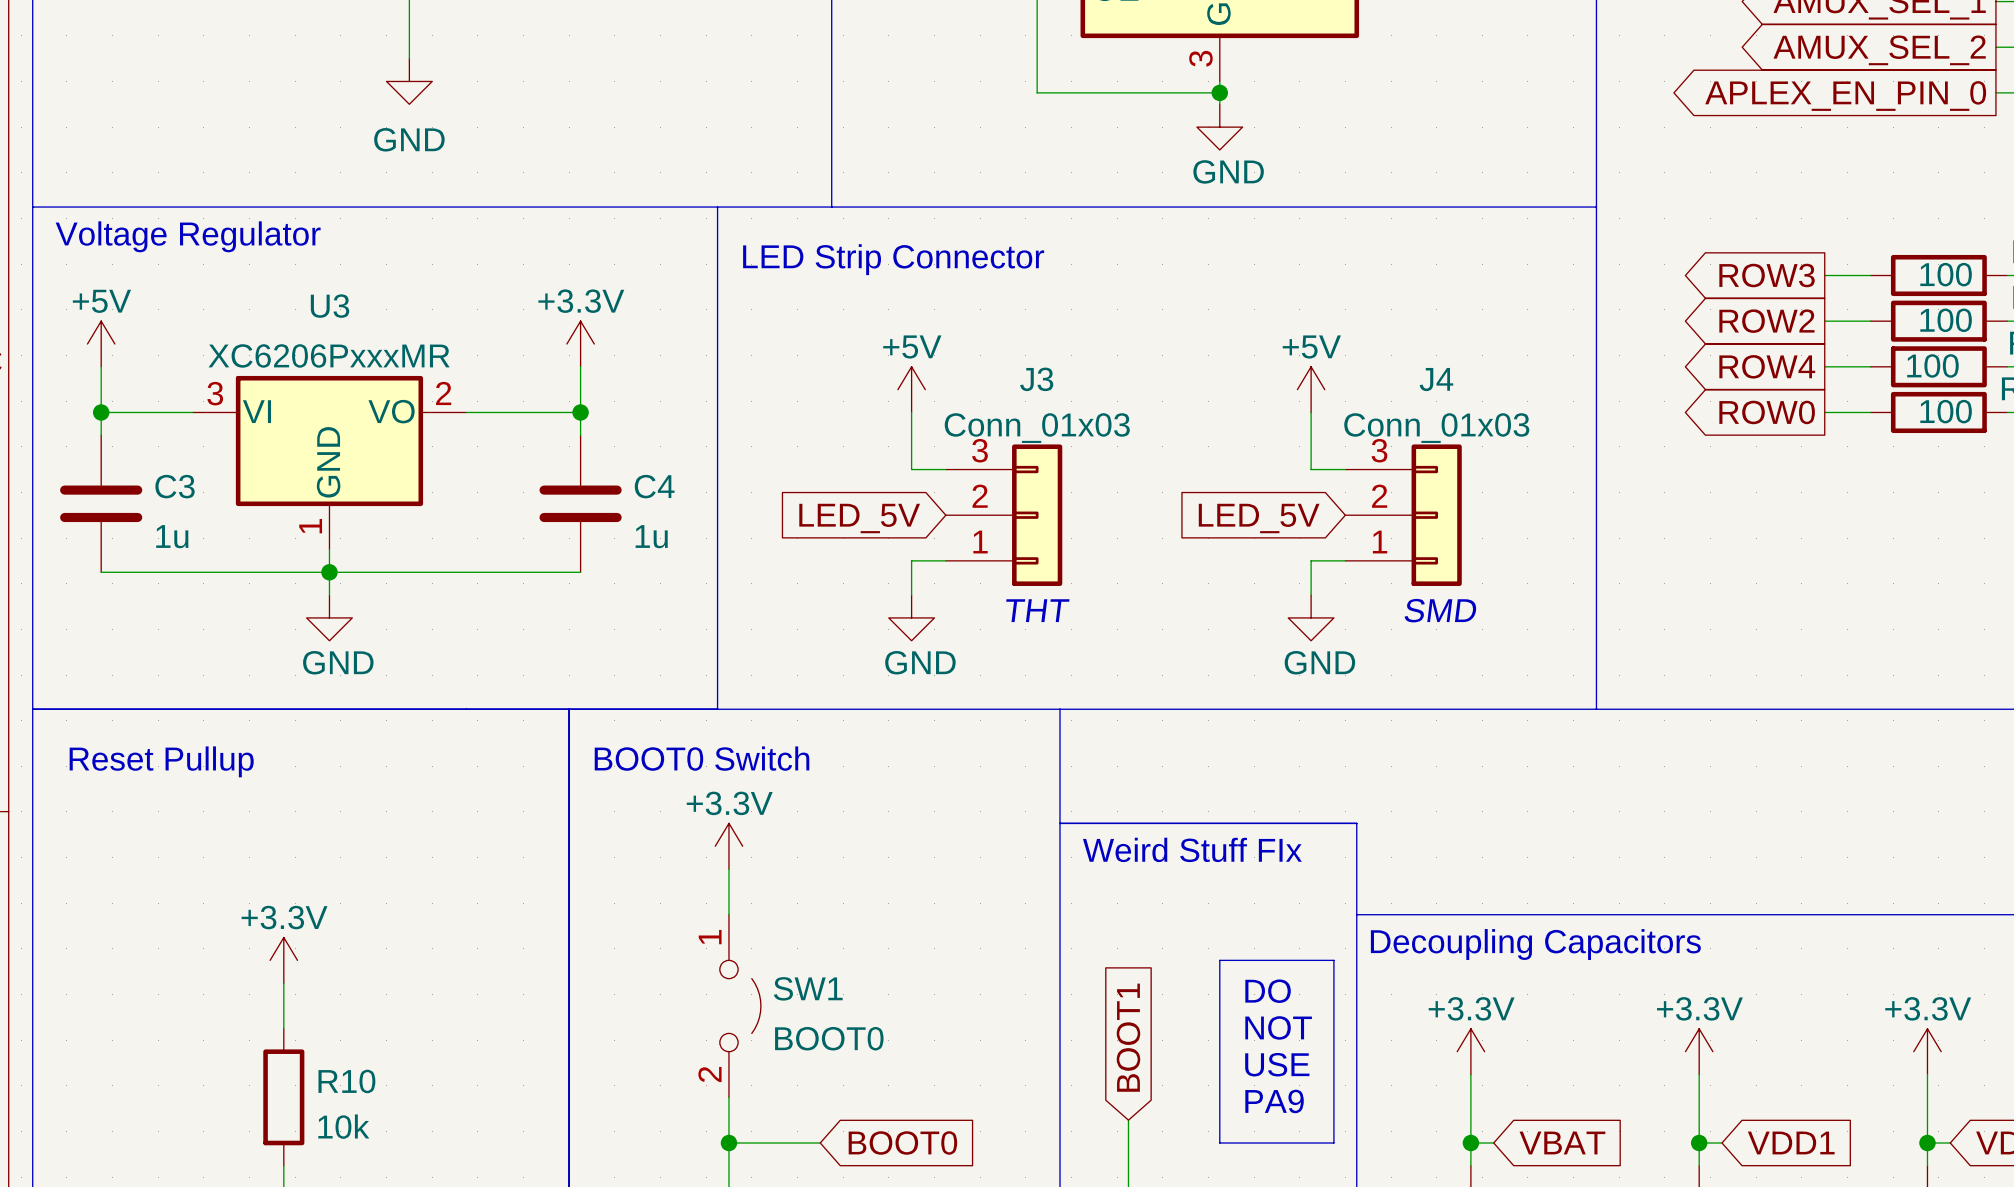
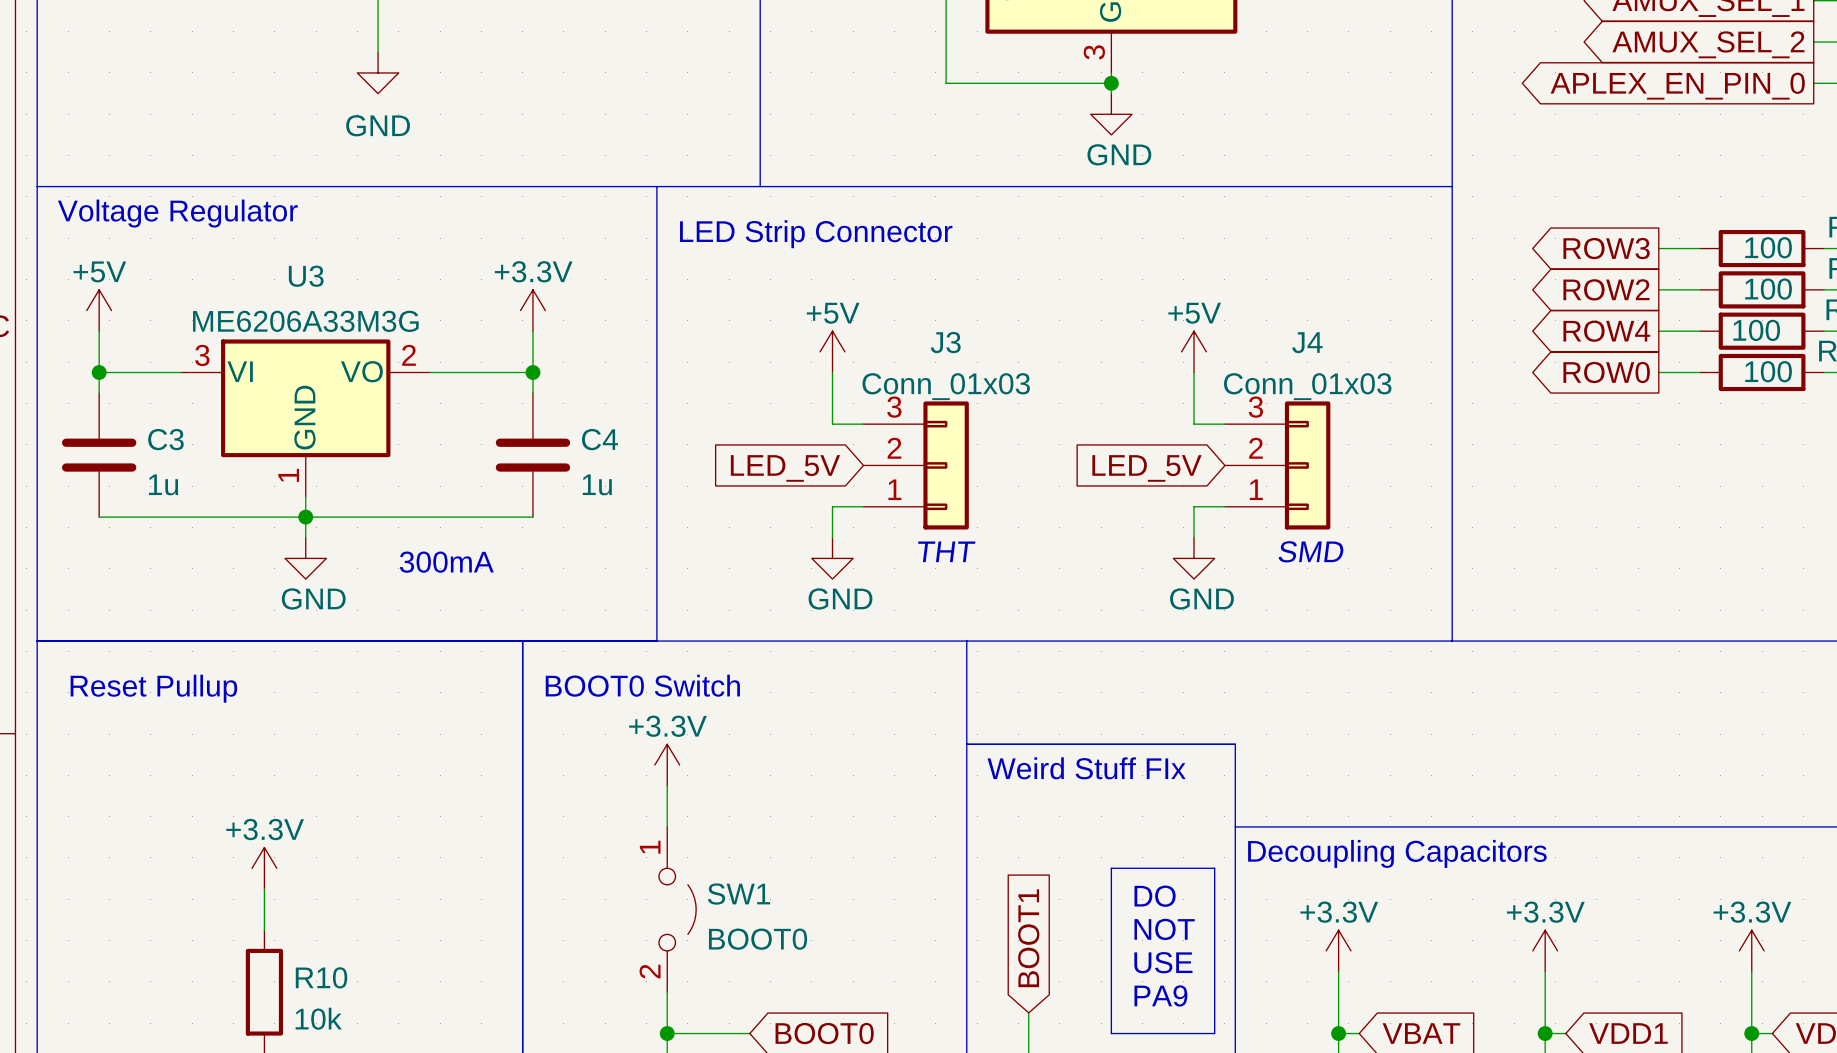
U3 value: XC6206PxxxMR (329, 355) -> ME6206A33M3G (305, 321)
text: none -> 300mA (446, 562)

